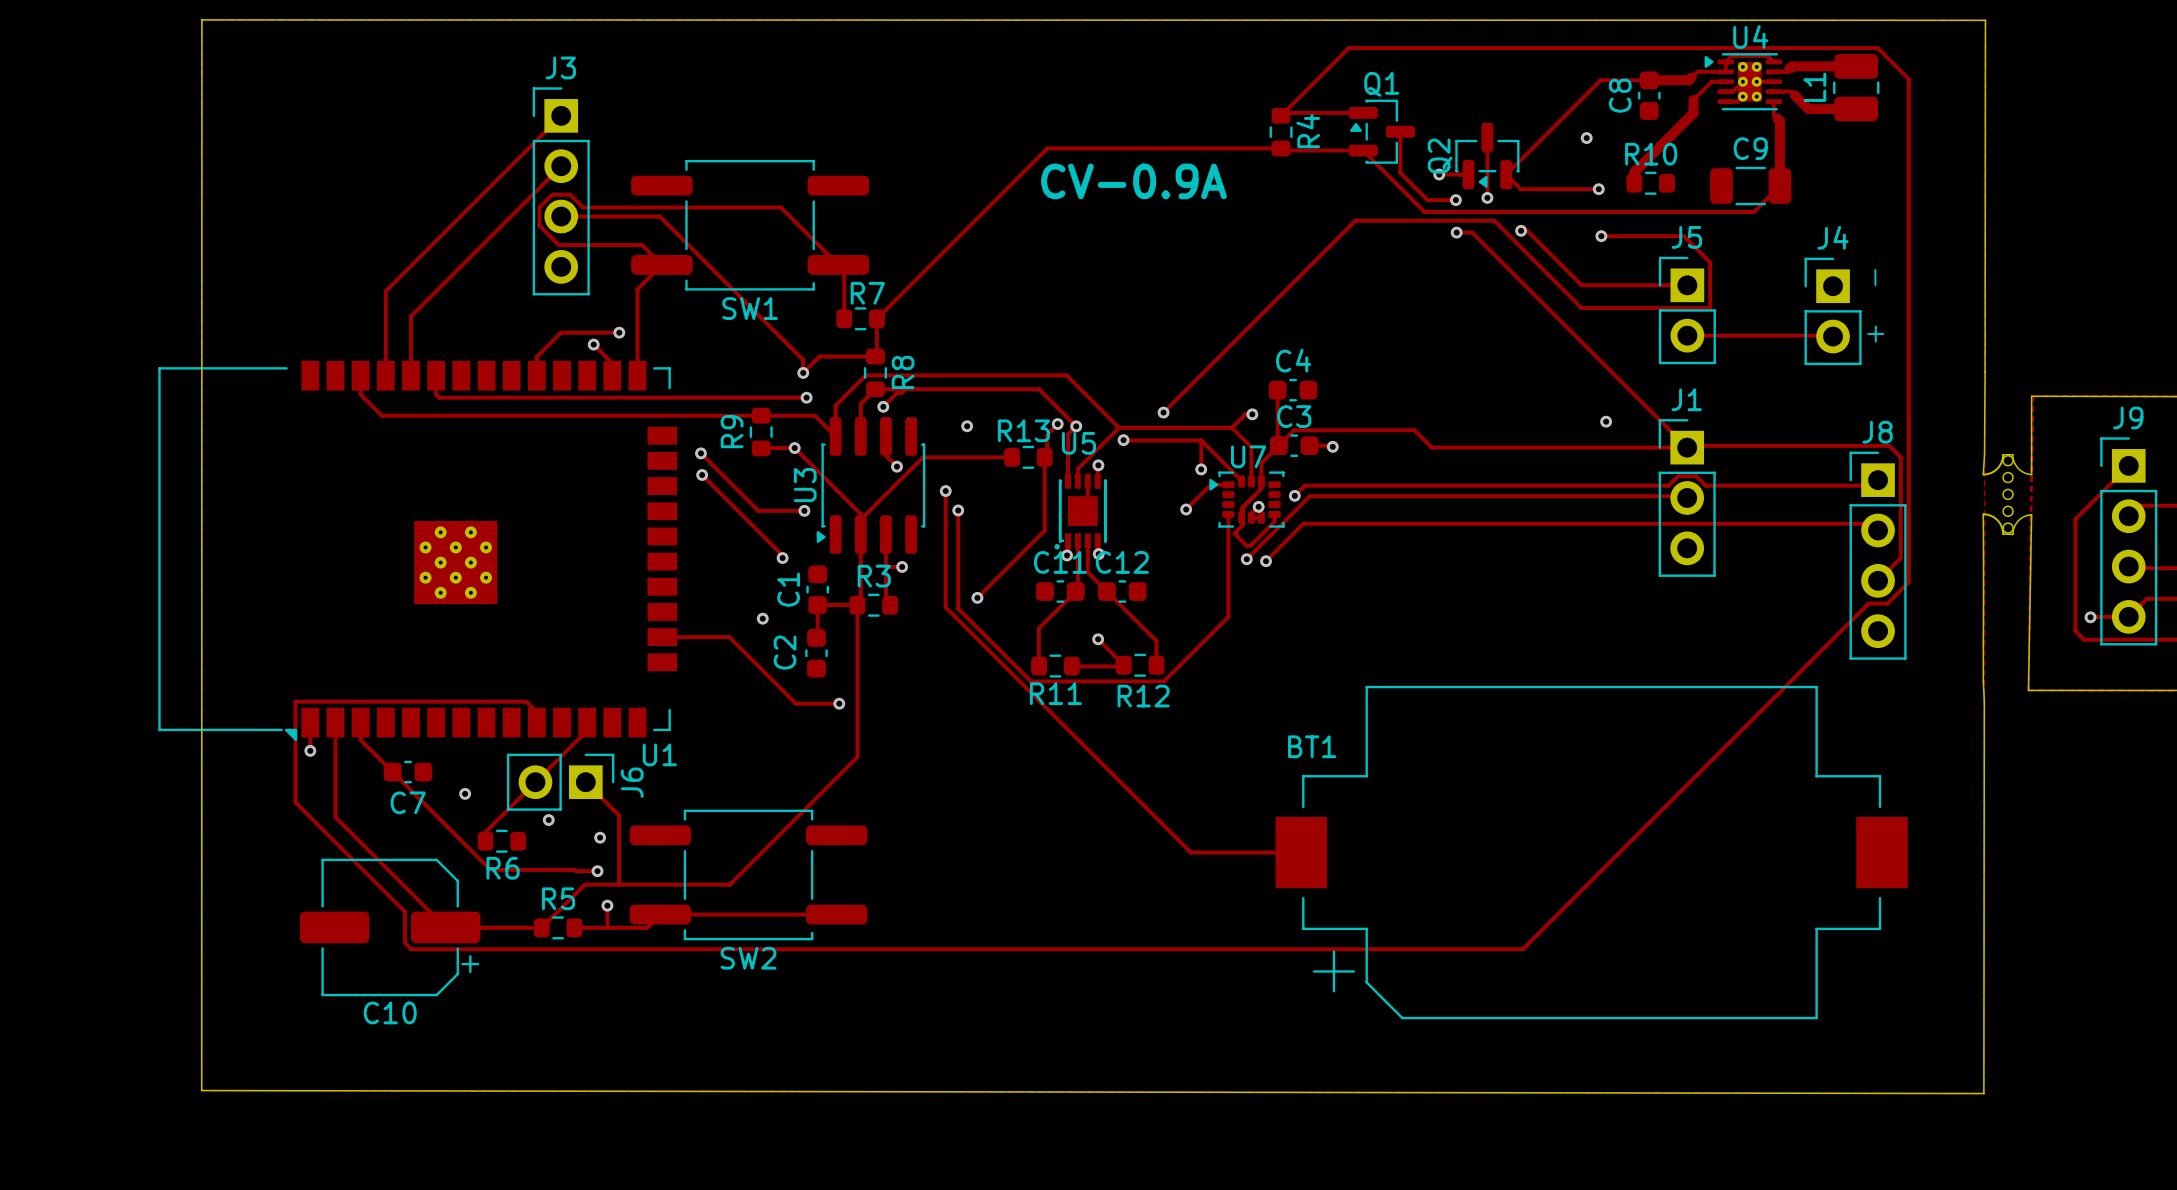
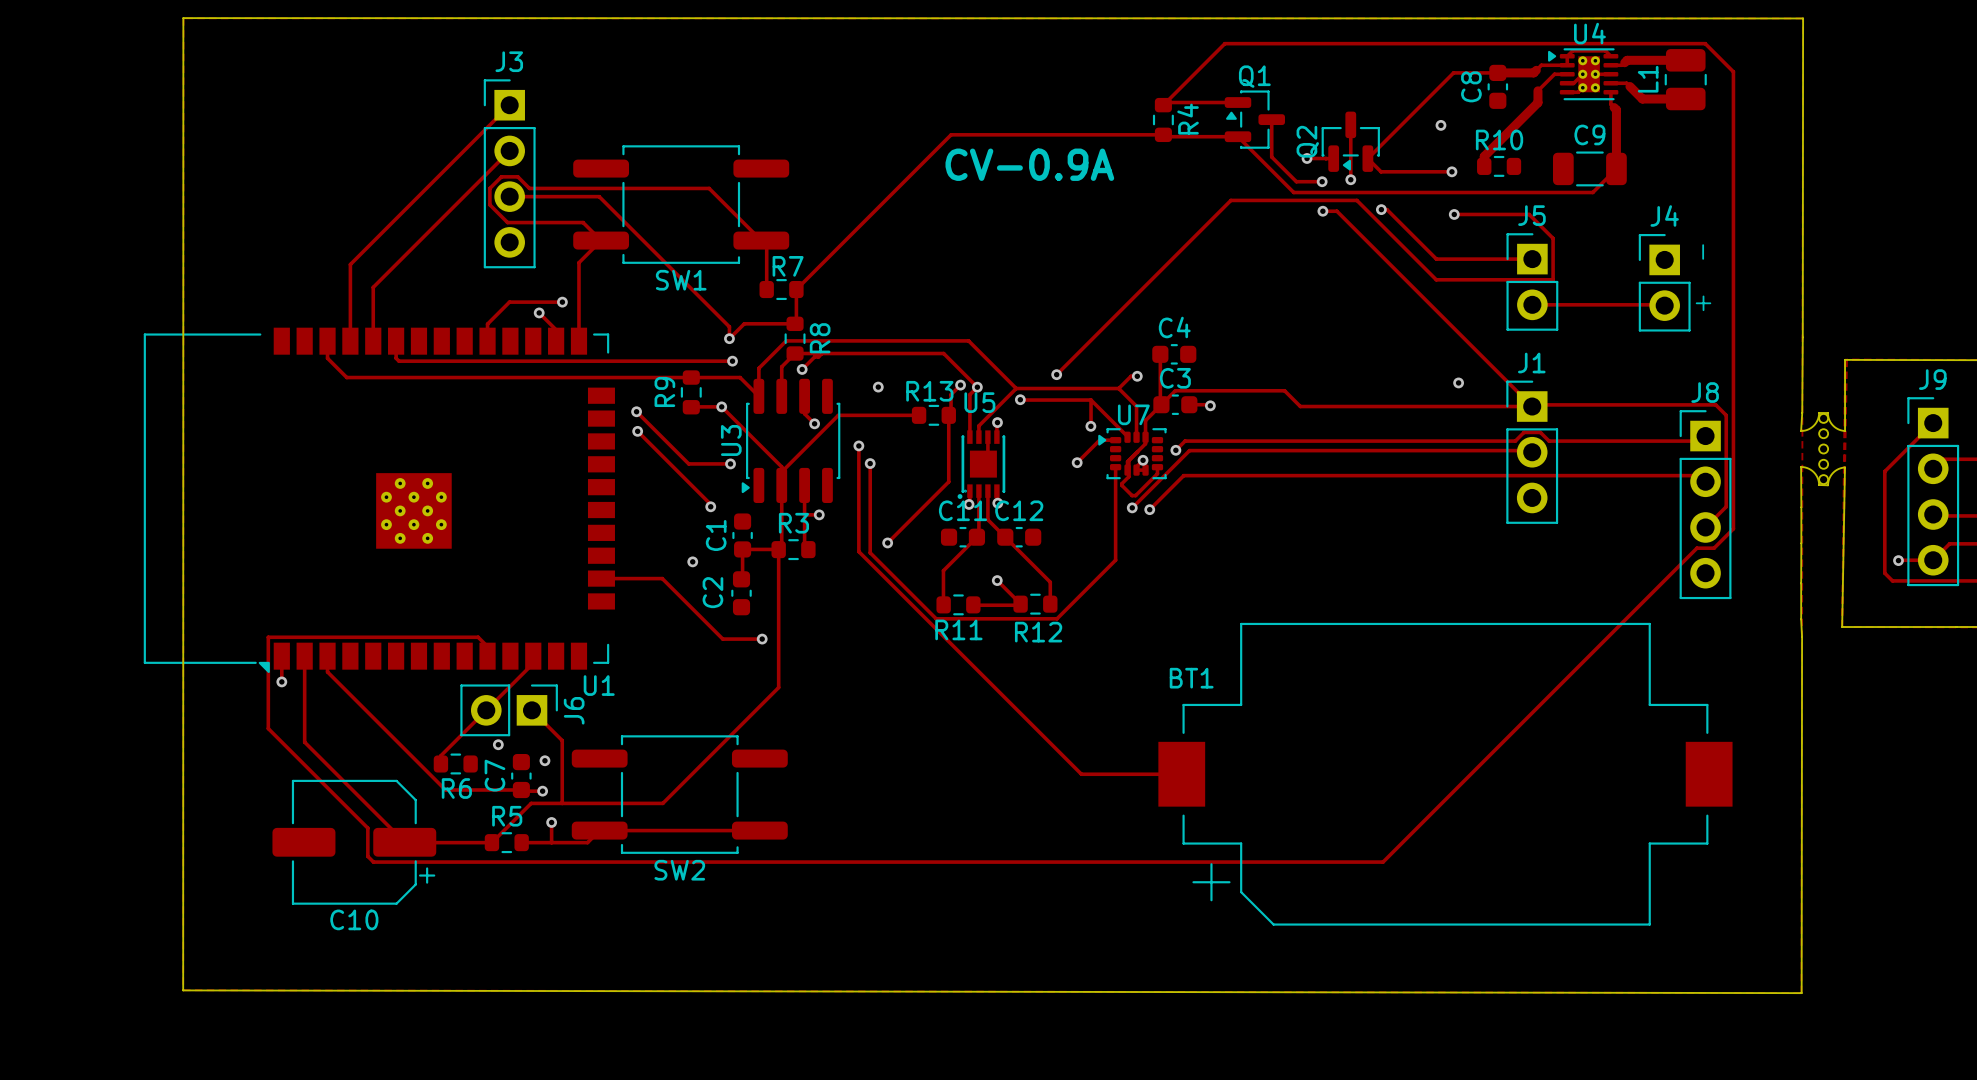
C7 rotation: 0° (408, 772) -> 90° clockwise (521, 776)
C7 position: (408, 772) -> (521, 776)
via: (465, 793) -> none

